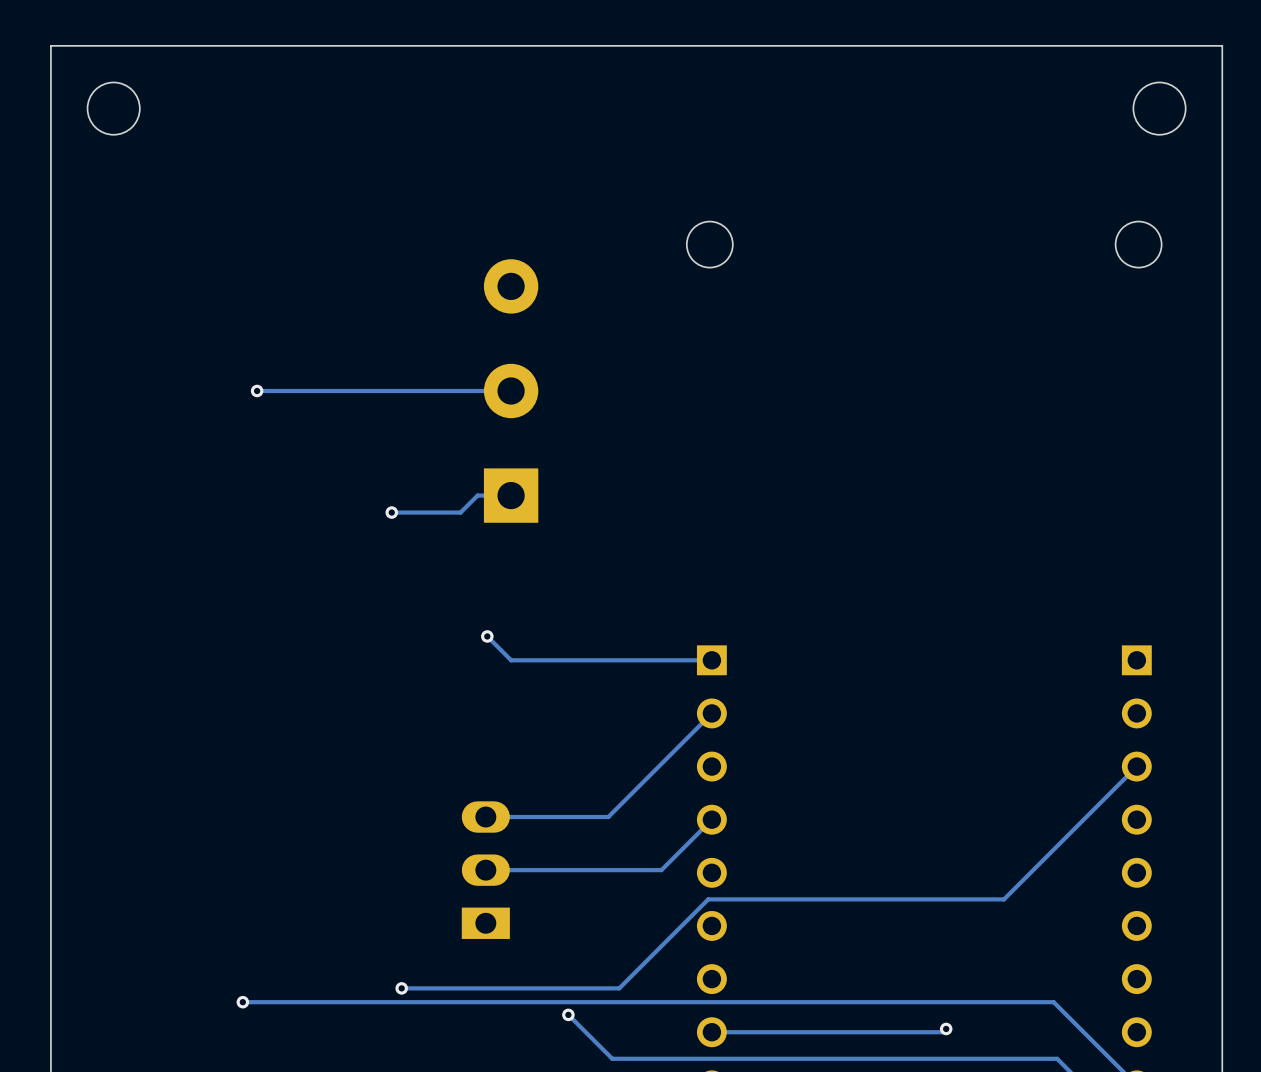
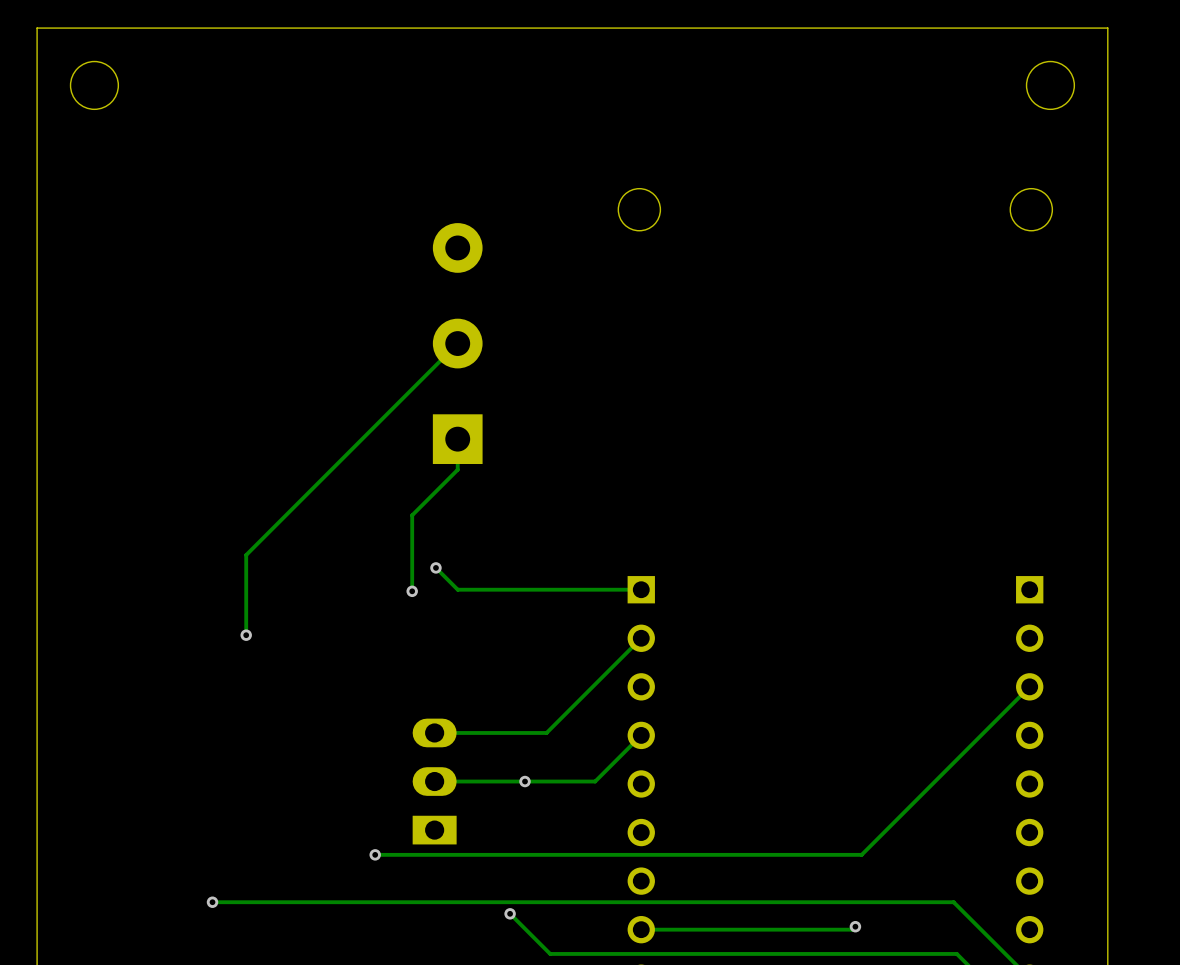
via: (257, 391) -> none
track: (511, 391) (257, 391) -> (457, 343) (246, 555) (246, 635)
track: (511, 495) (477, 495) (460, 512) (391, 512) -> (457, 439) (457, 469) (412, 515) (412, 591)
via: (391, 512) -> none
via: none -> (412, 591)
via: none -> (246, 635)
via: none -> (525, 781)
track: (1004, 899) (708, 899) (619, 988) (401, 988) -> (908, 808) (861, 854) (375, 854)
via position: (401, 988) -> (375, 854)

